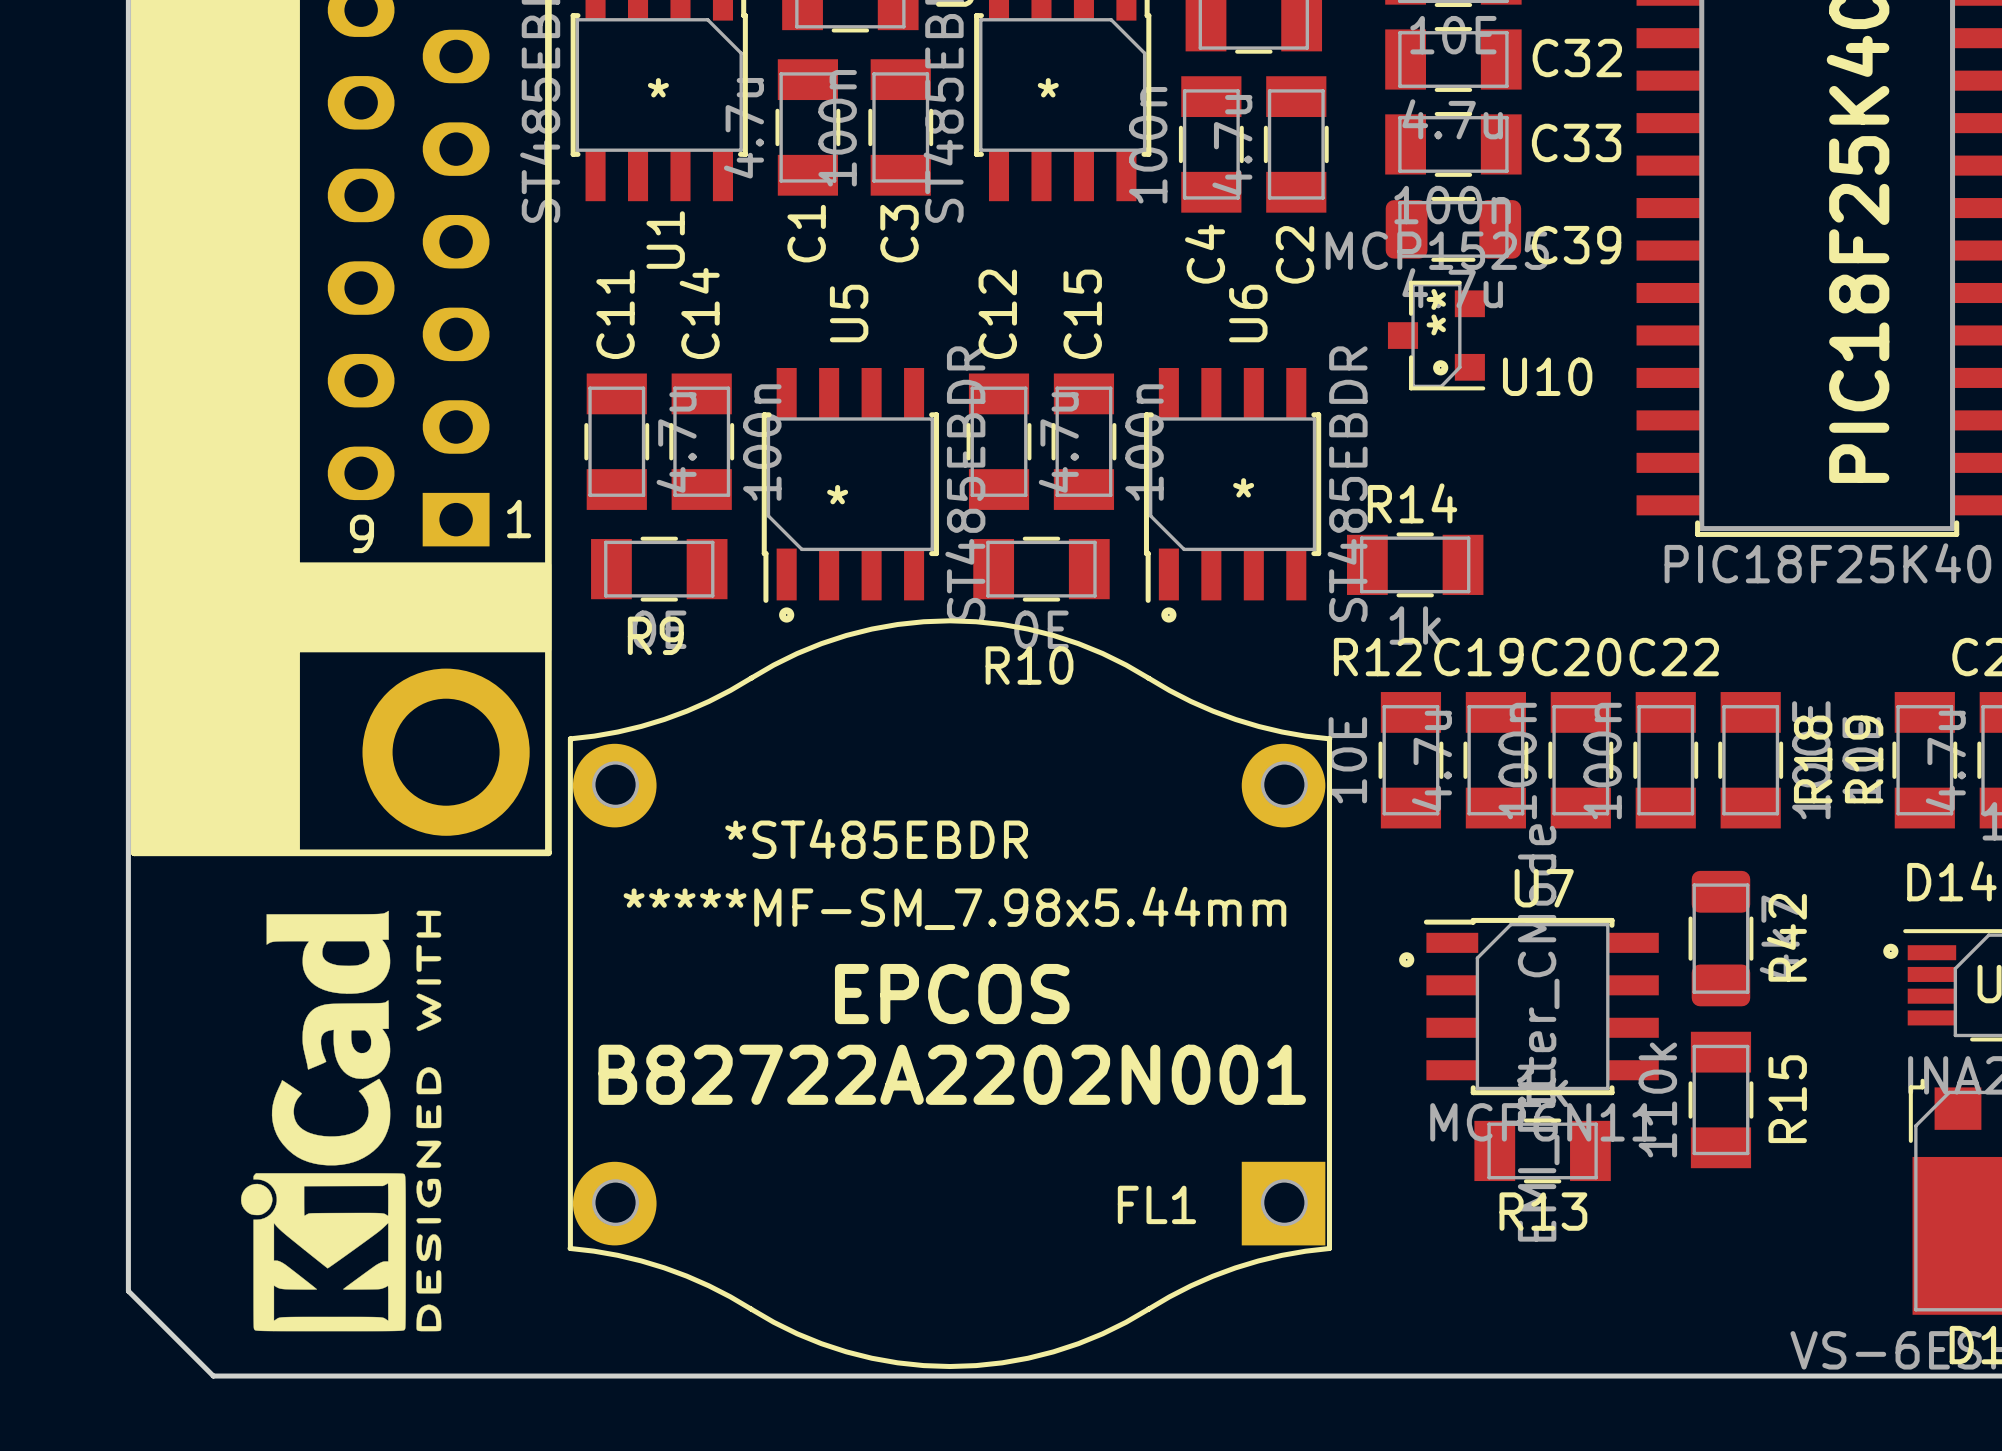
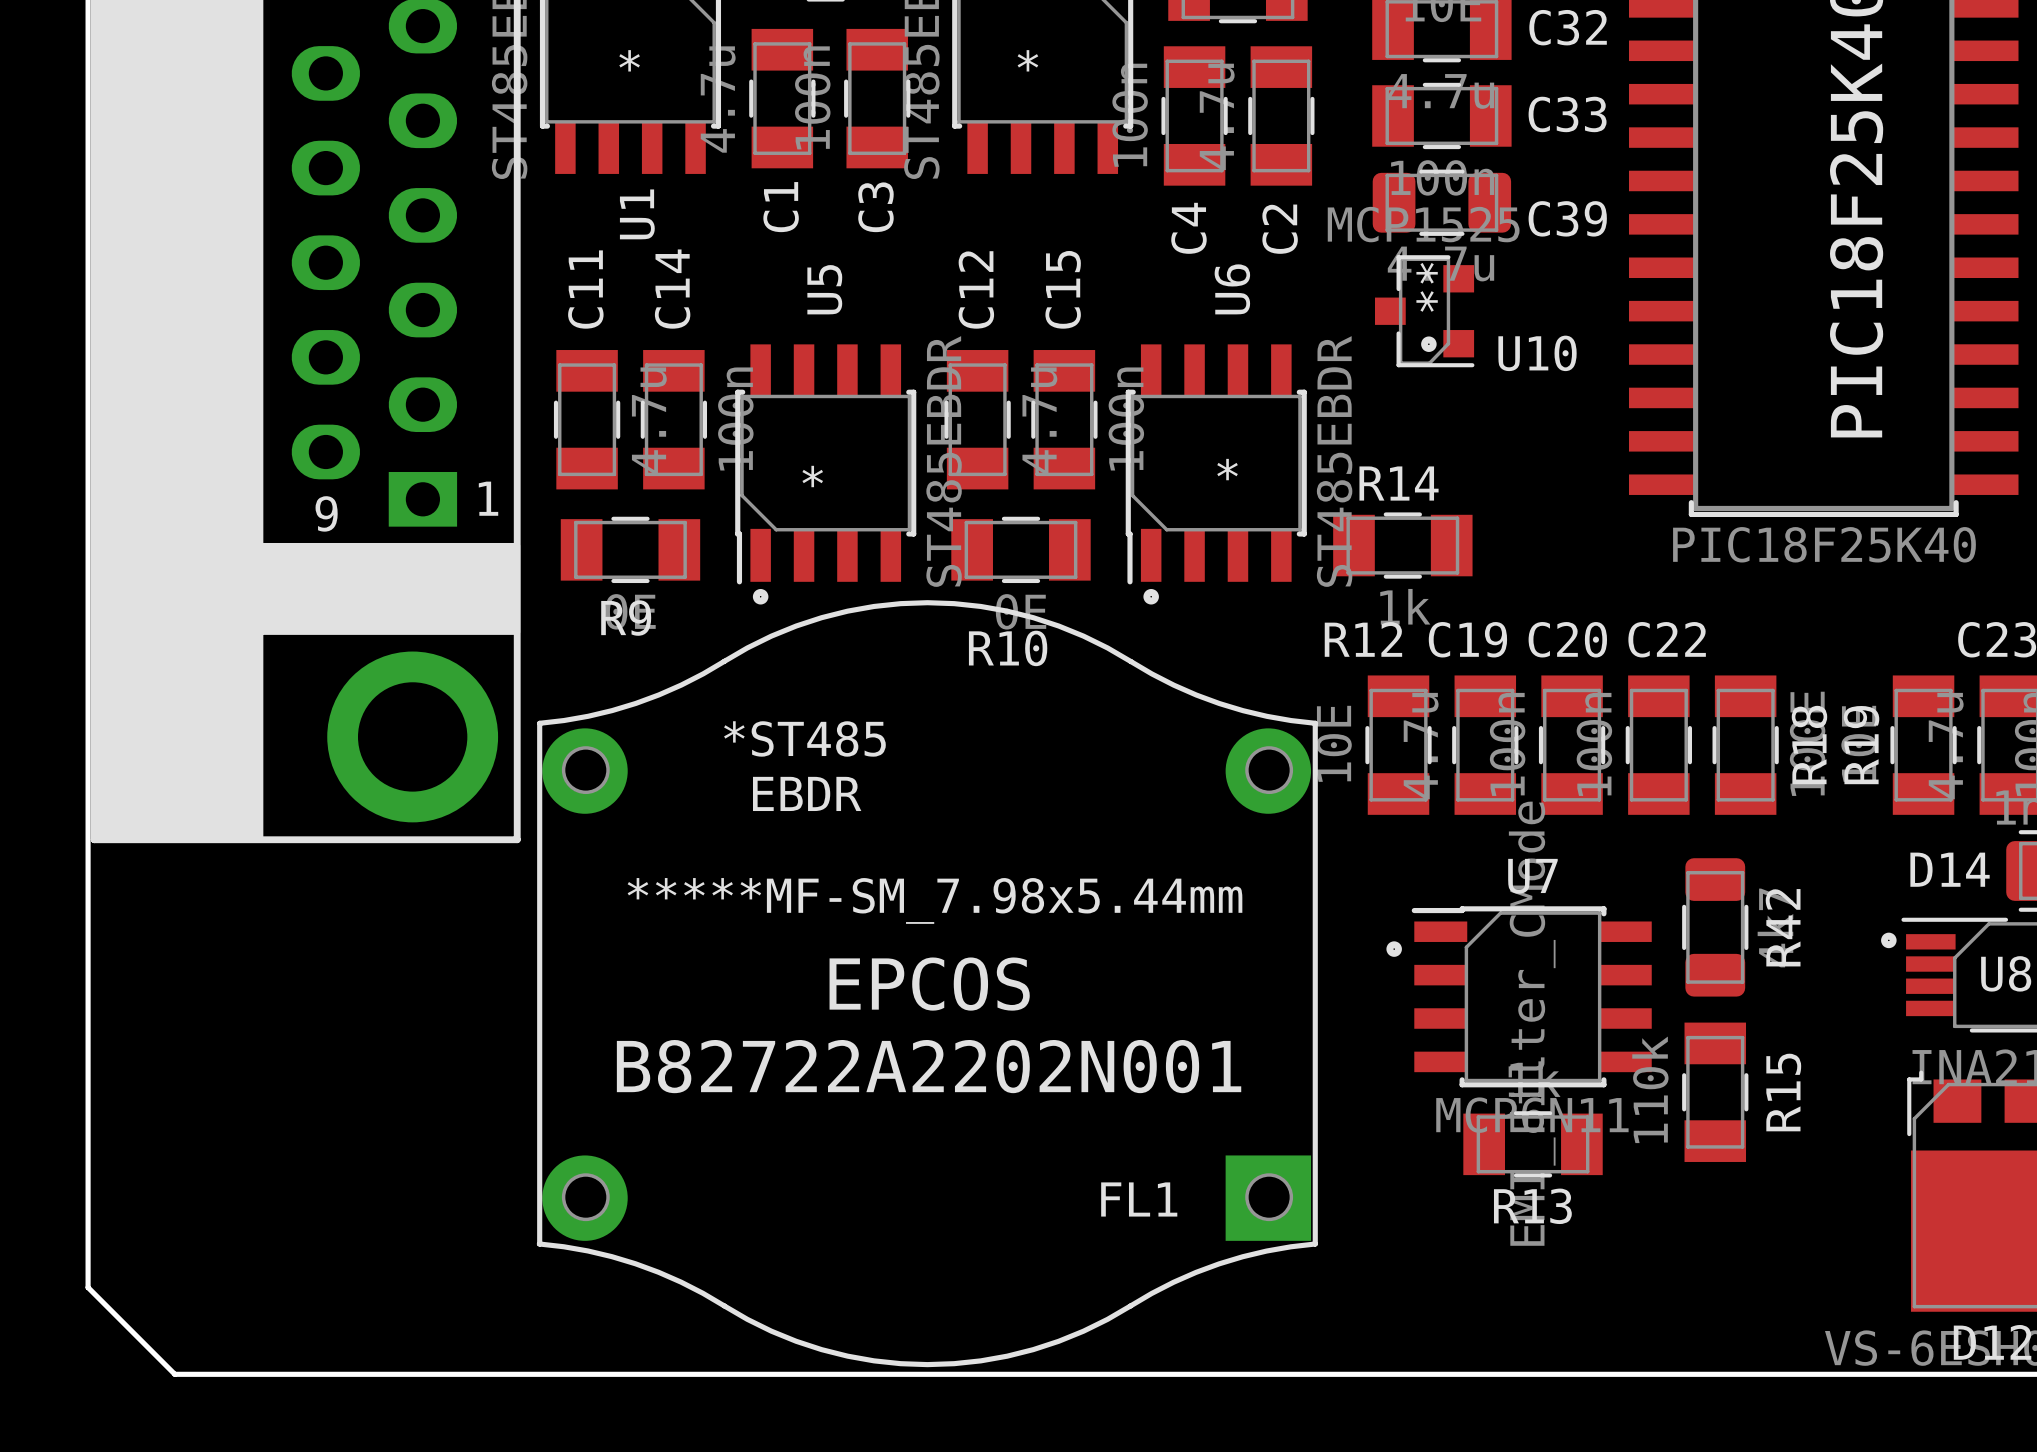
text: none -> *ST485 (804, 738)
text: none -> EBDR (807, 793)
text: *ST485EBDR (876, 838) -> none
drawing: [241, 910, 442, 1332] -> none

